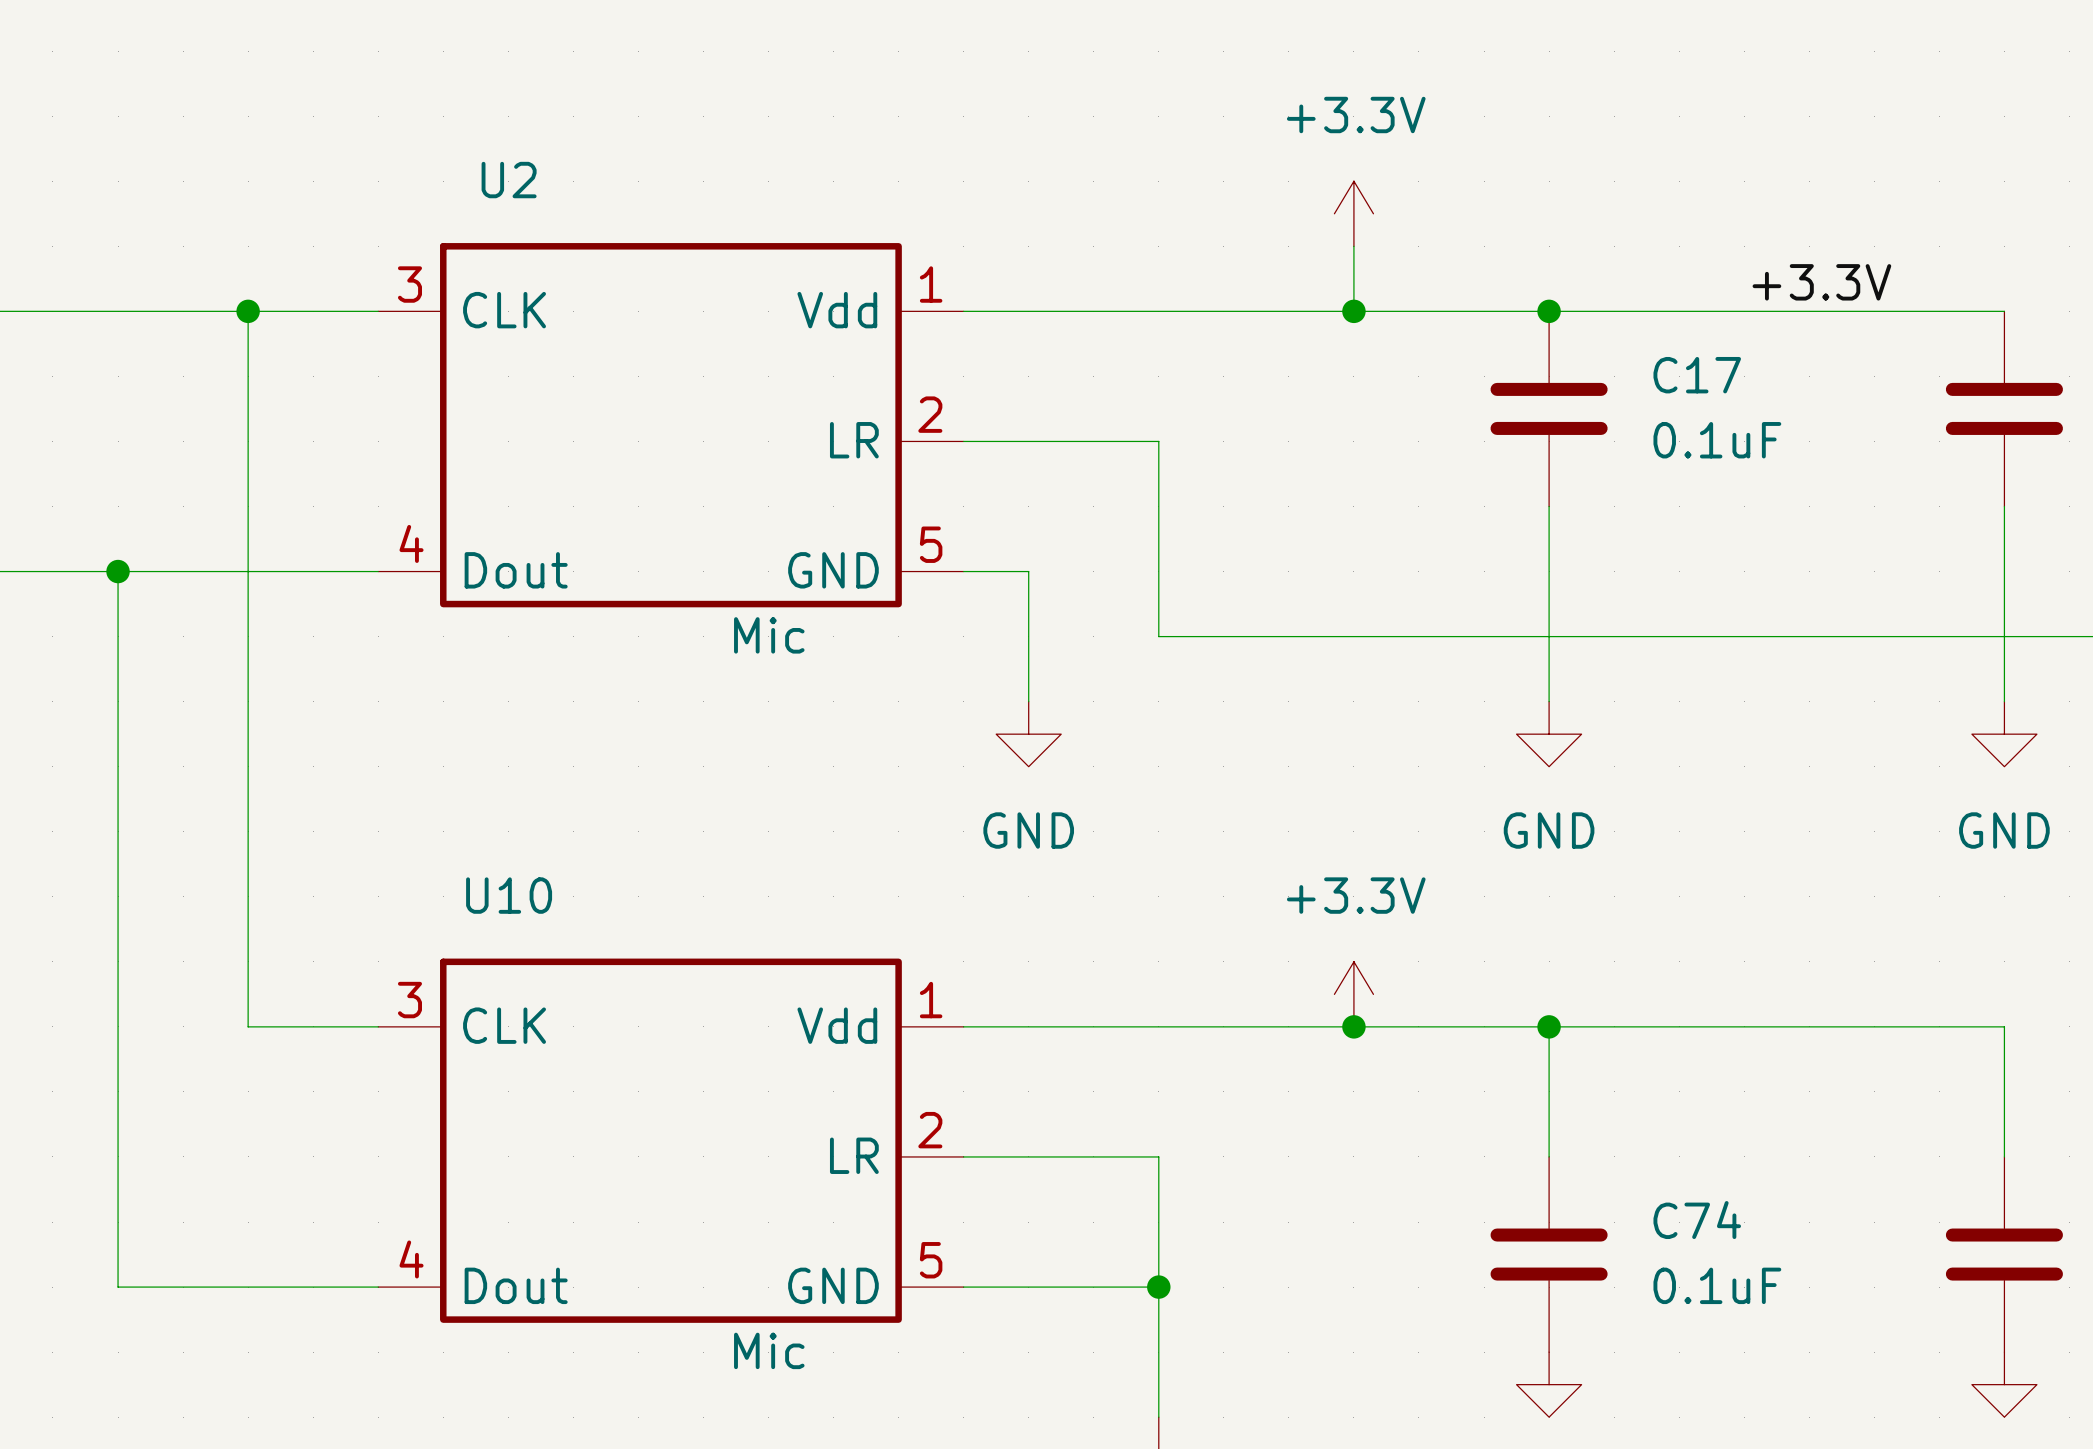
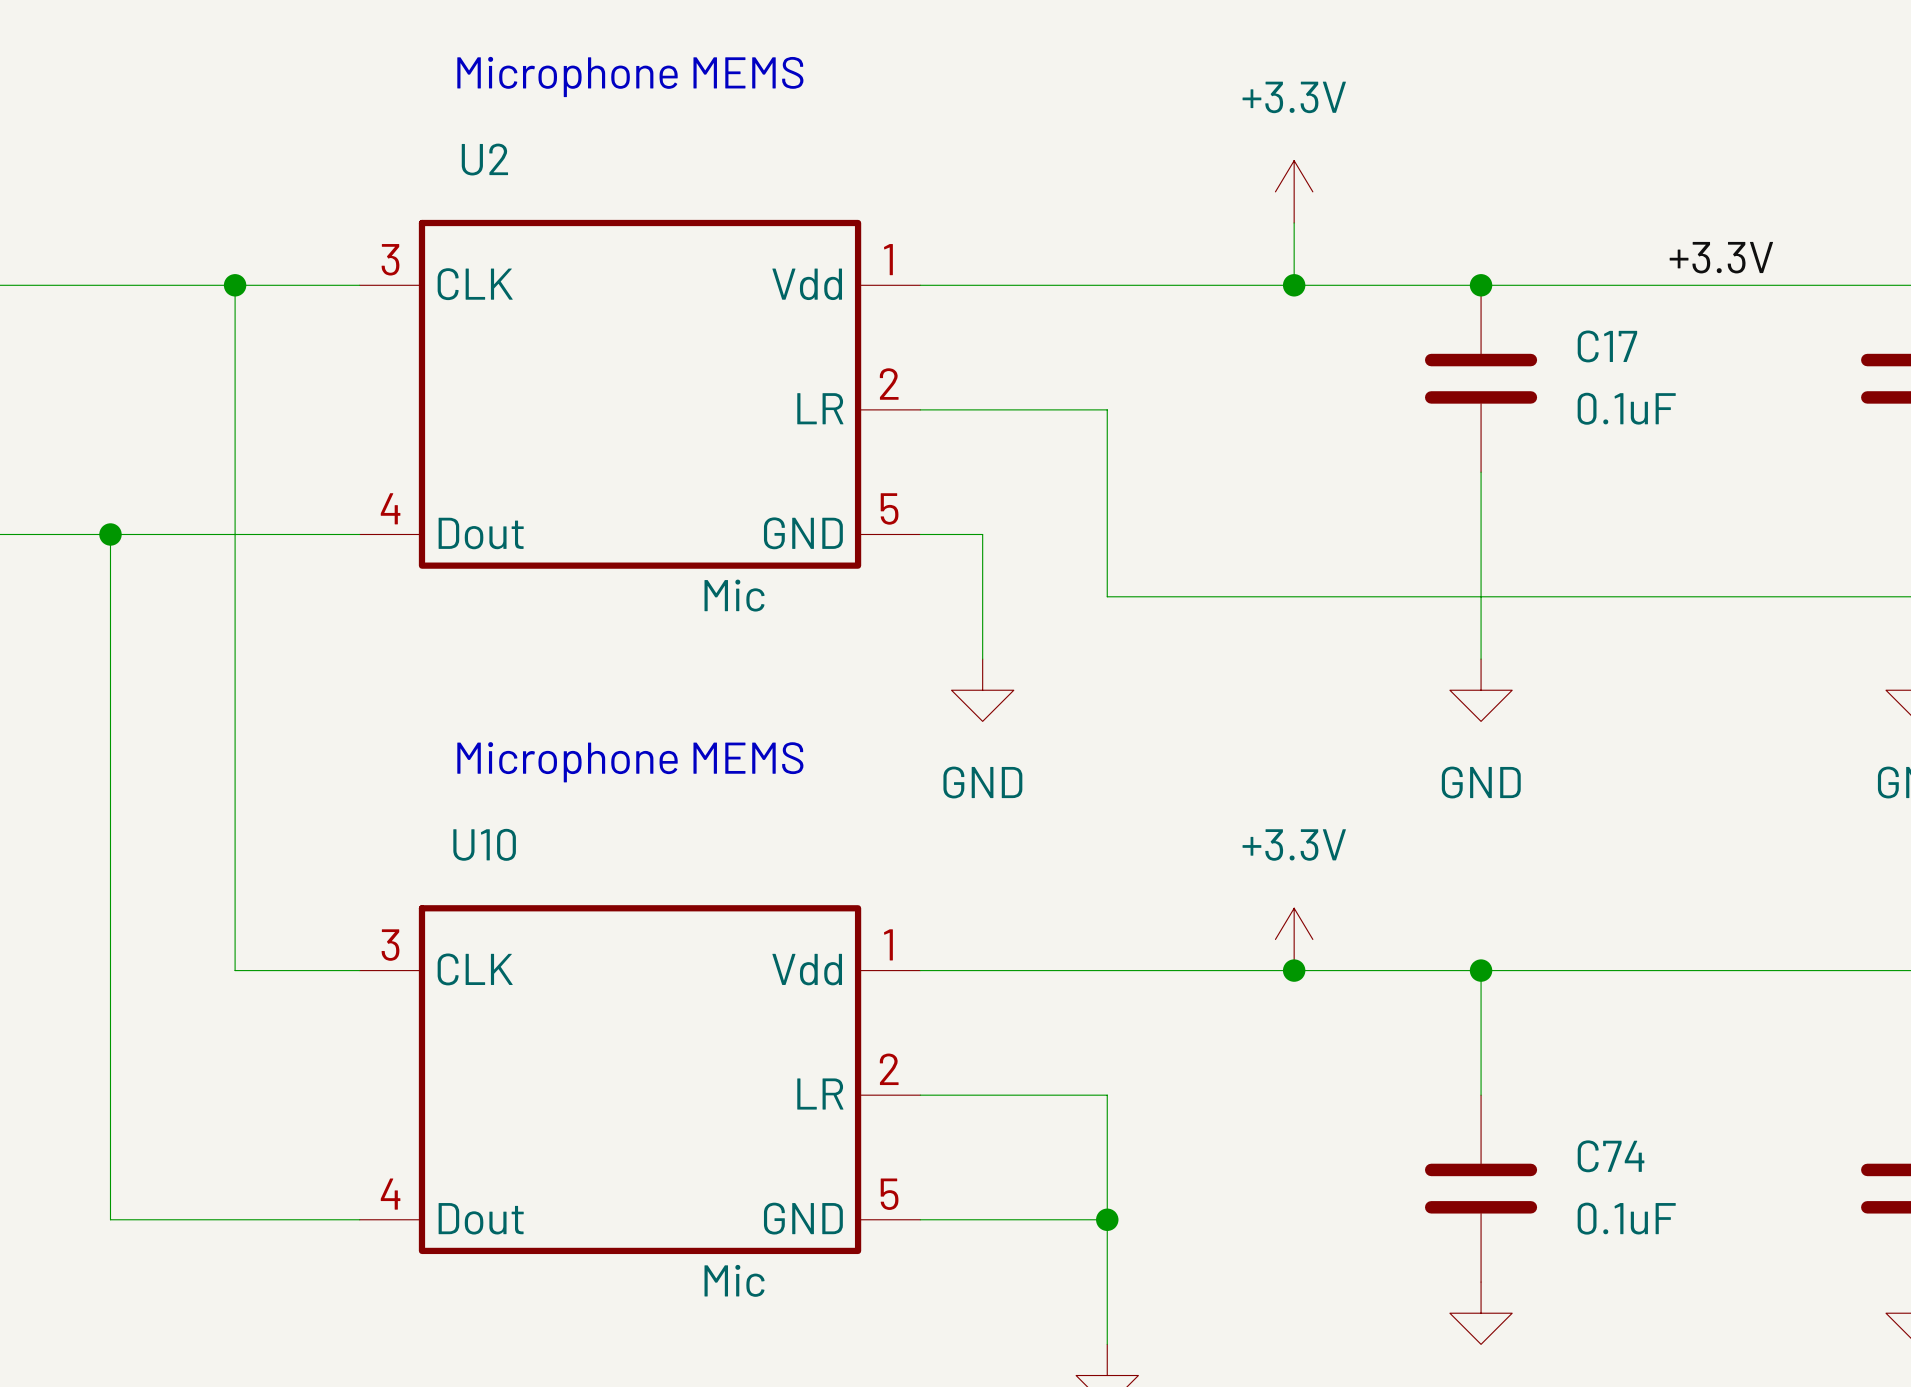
text: none -> Microphone MEMS (630, 76)
text: none -> Microphone MEMS (630, 762)

